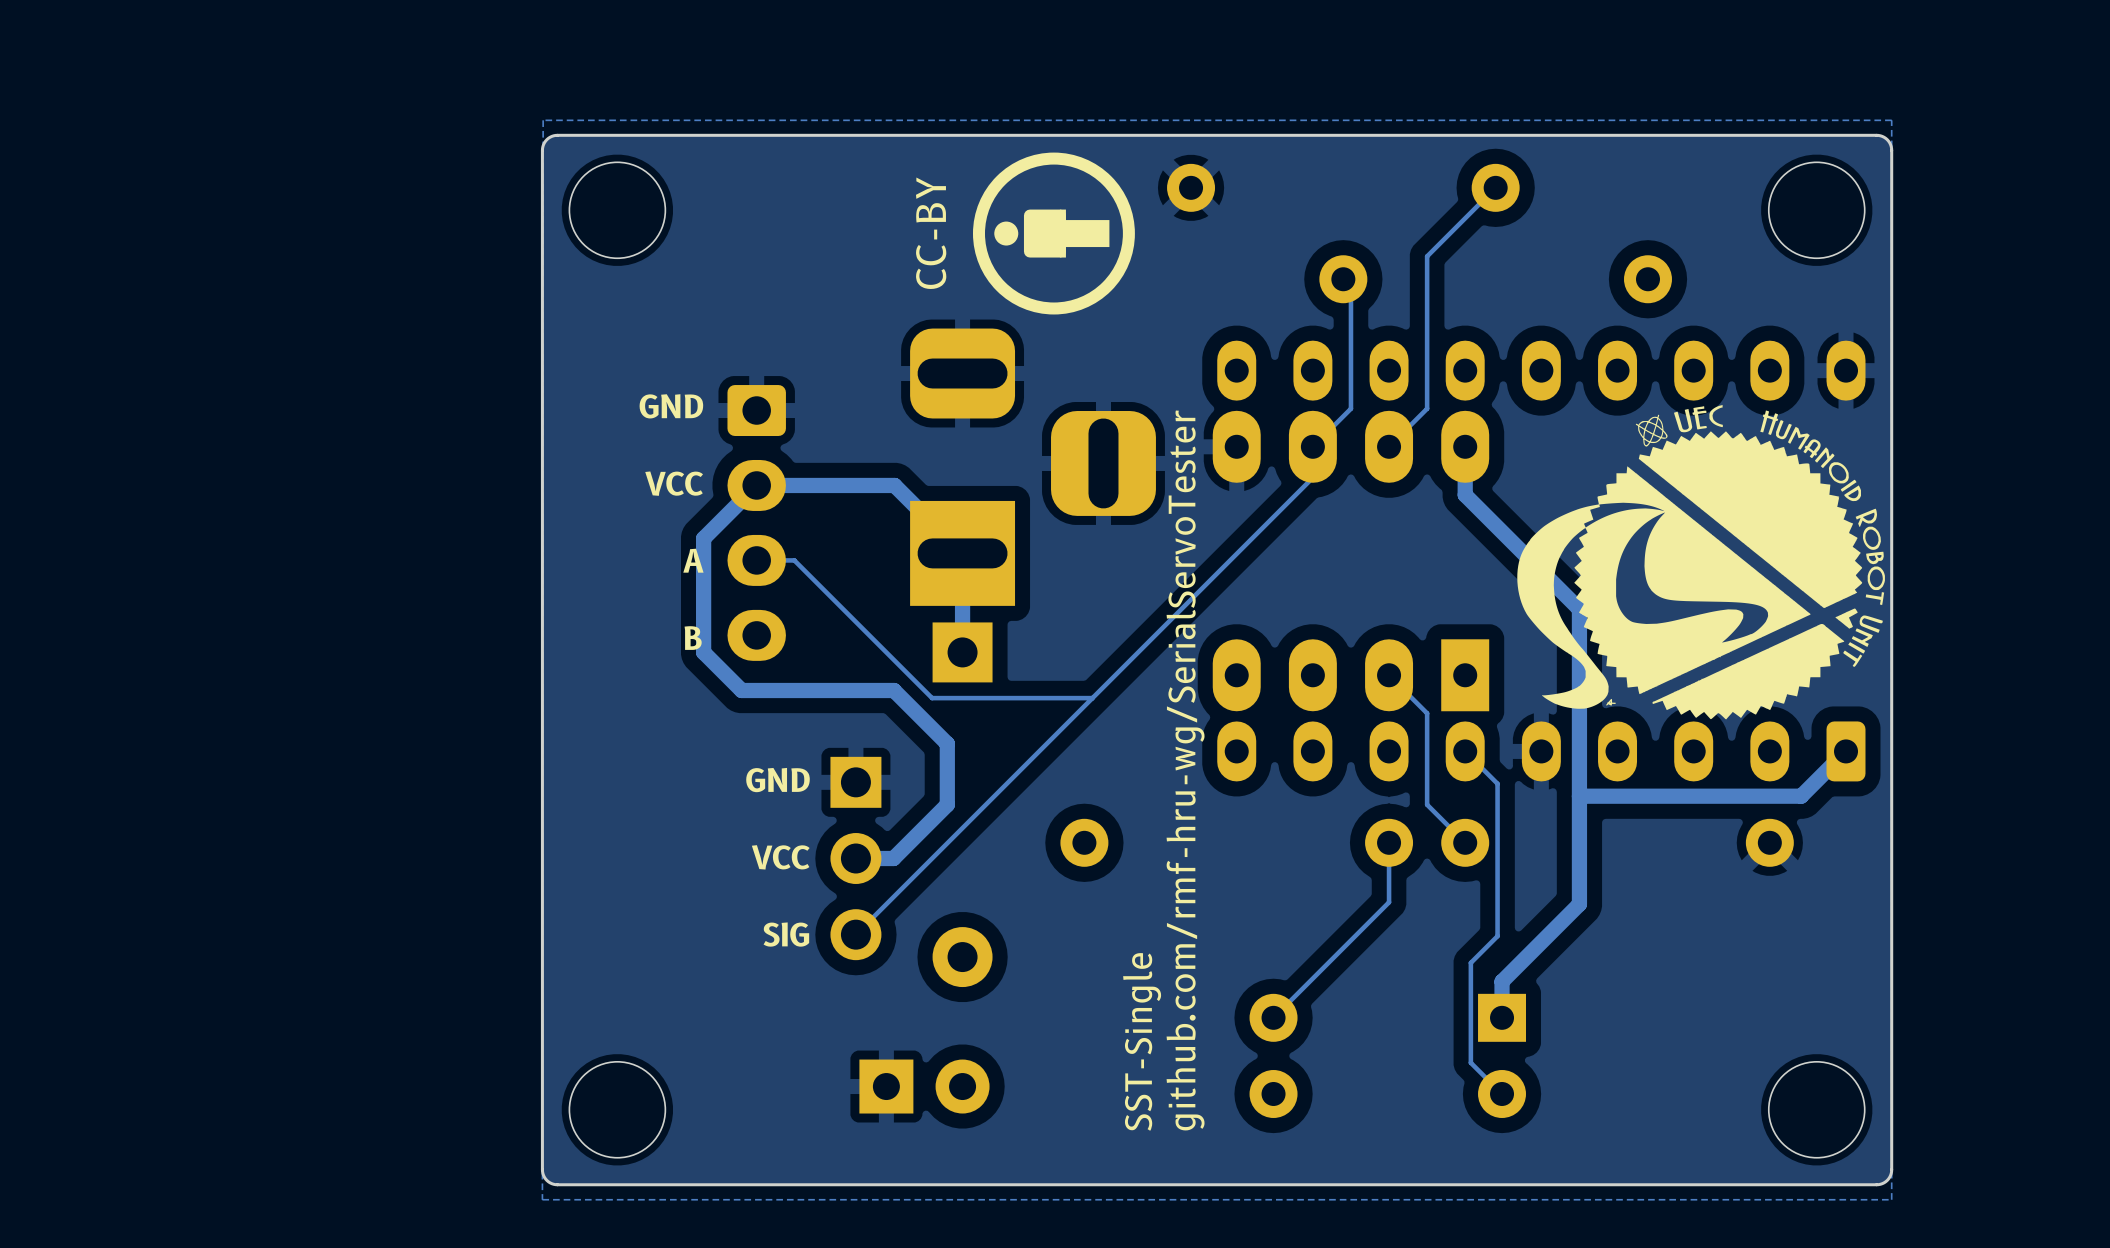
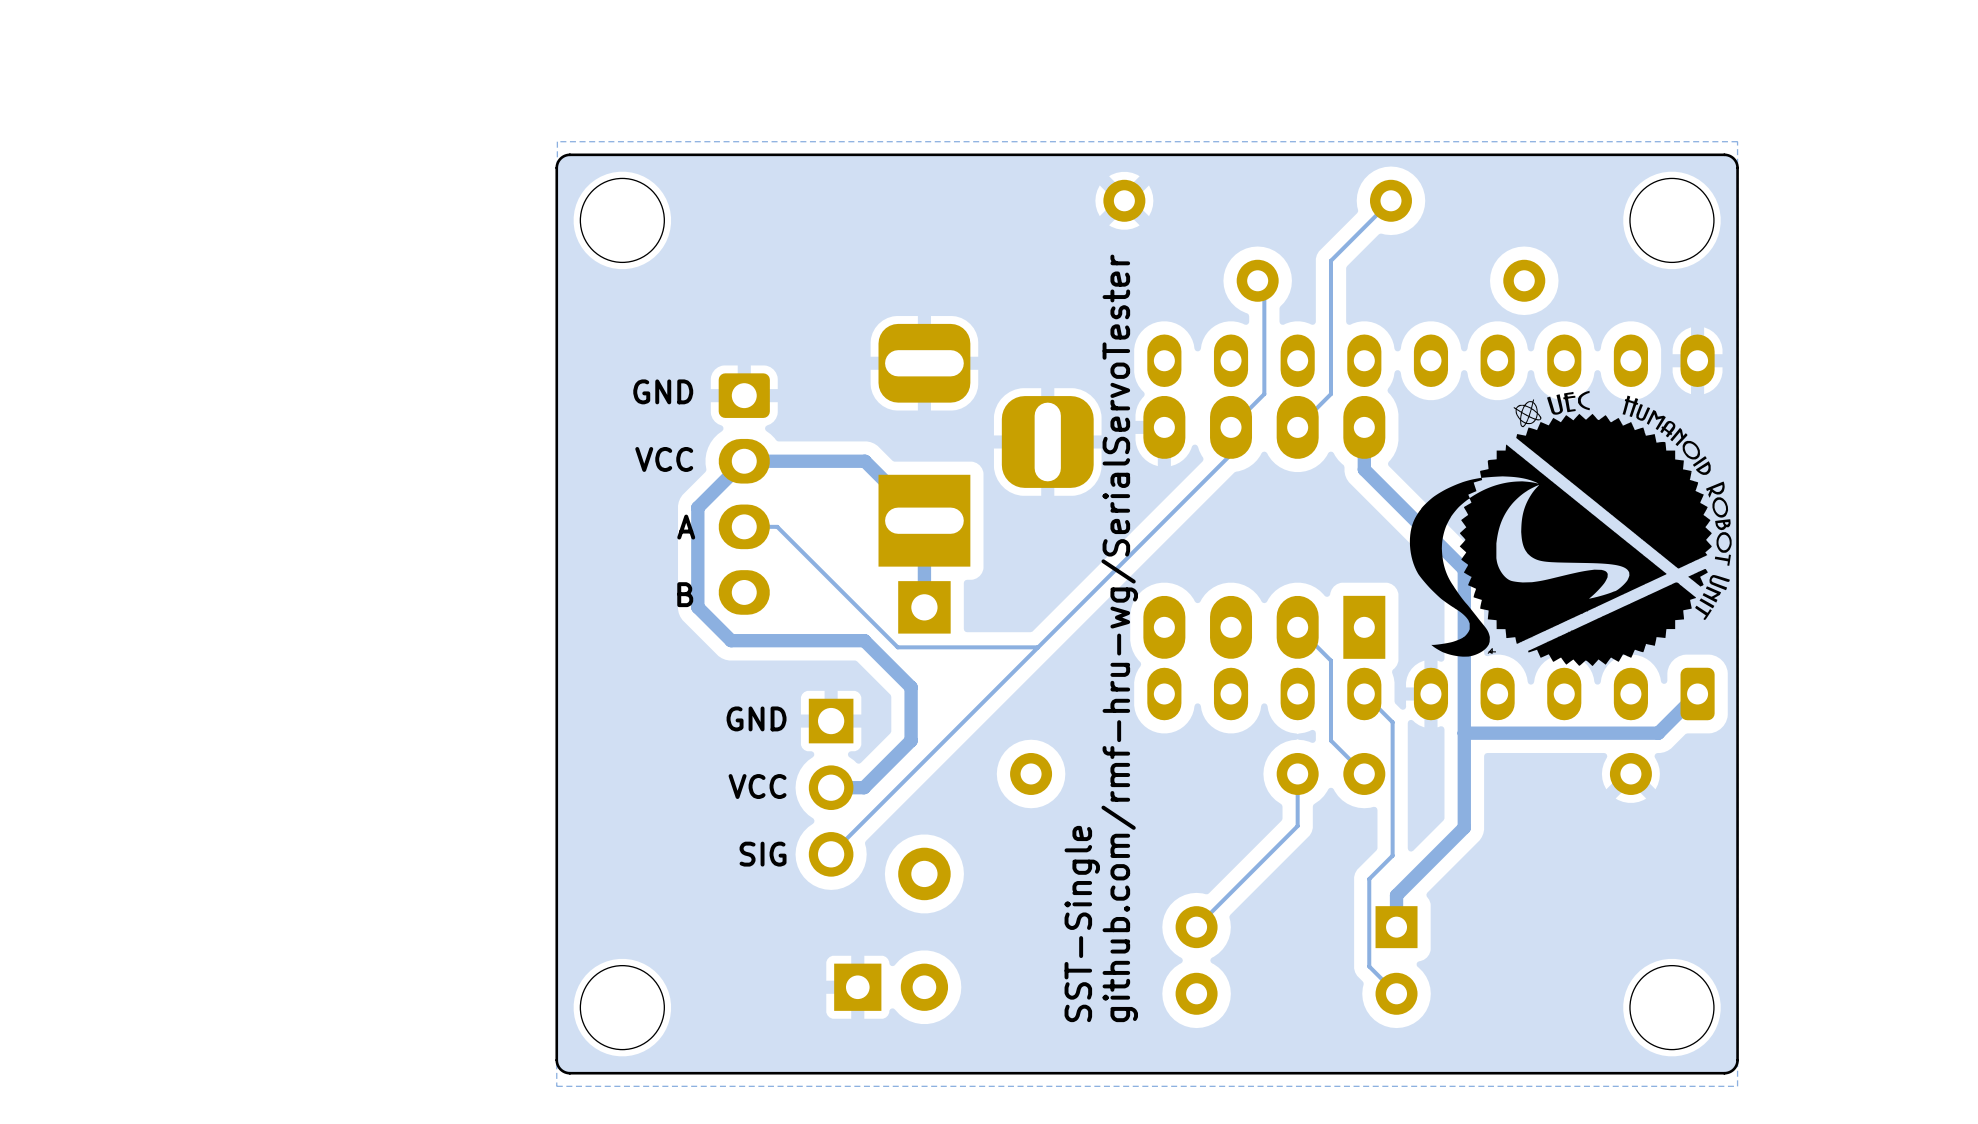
drawing: [972, 152, 1135, 315] -> none

